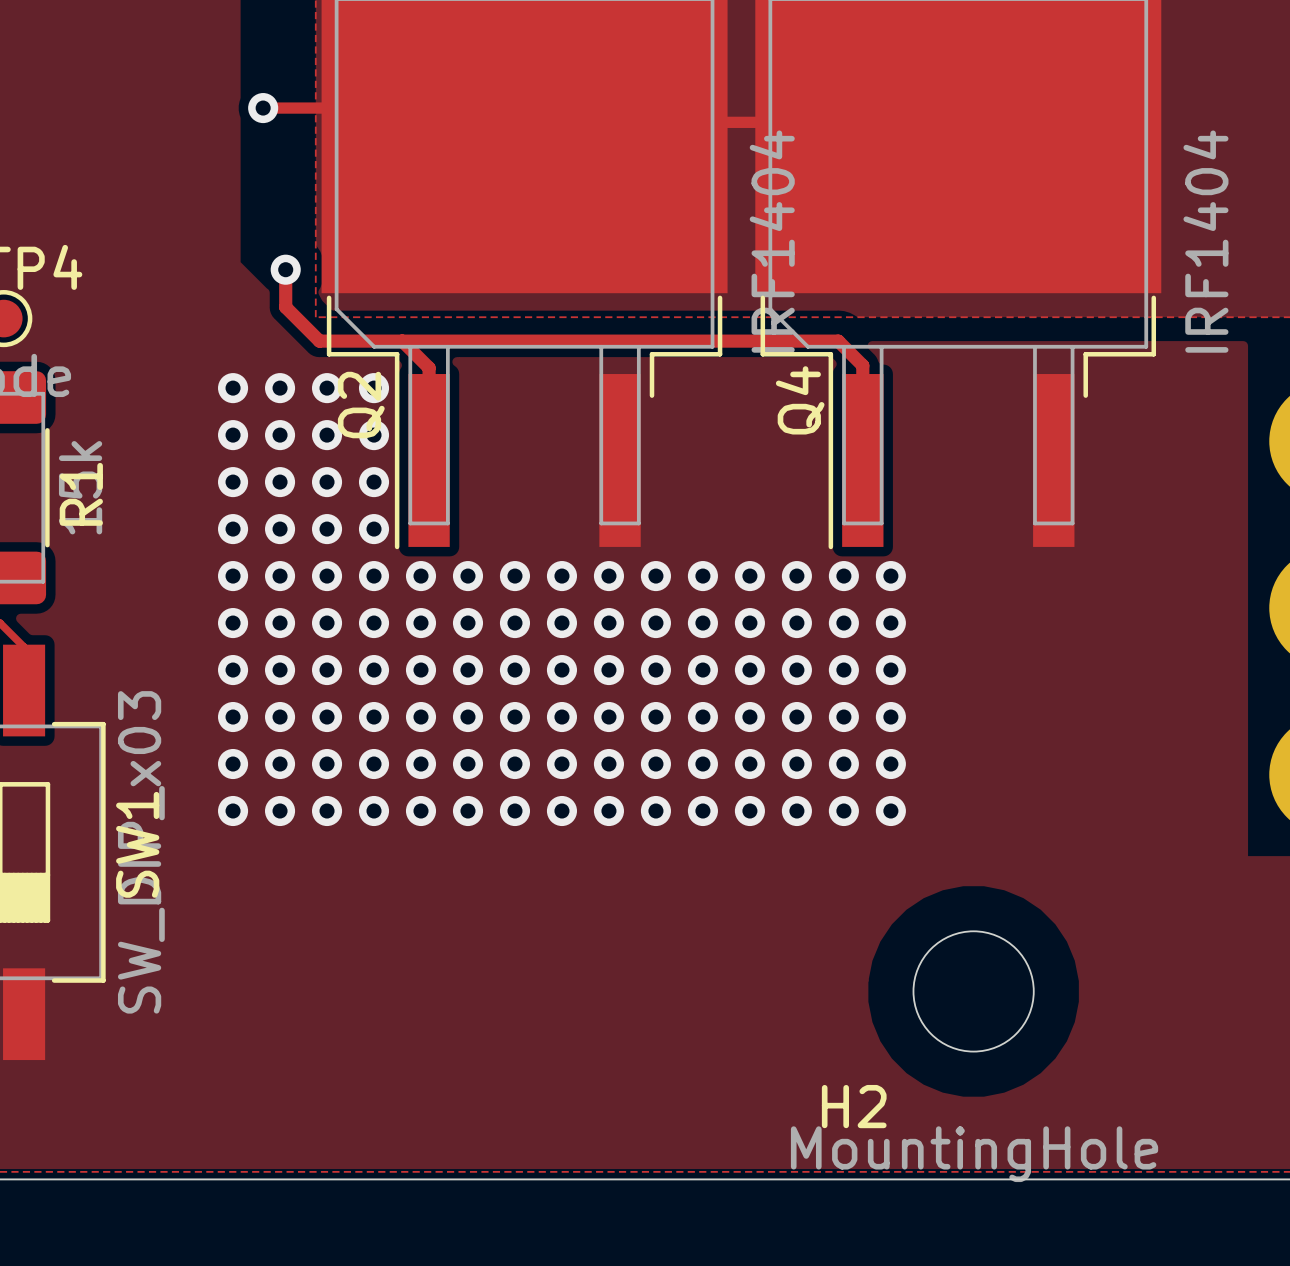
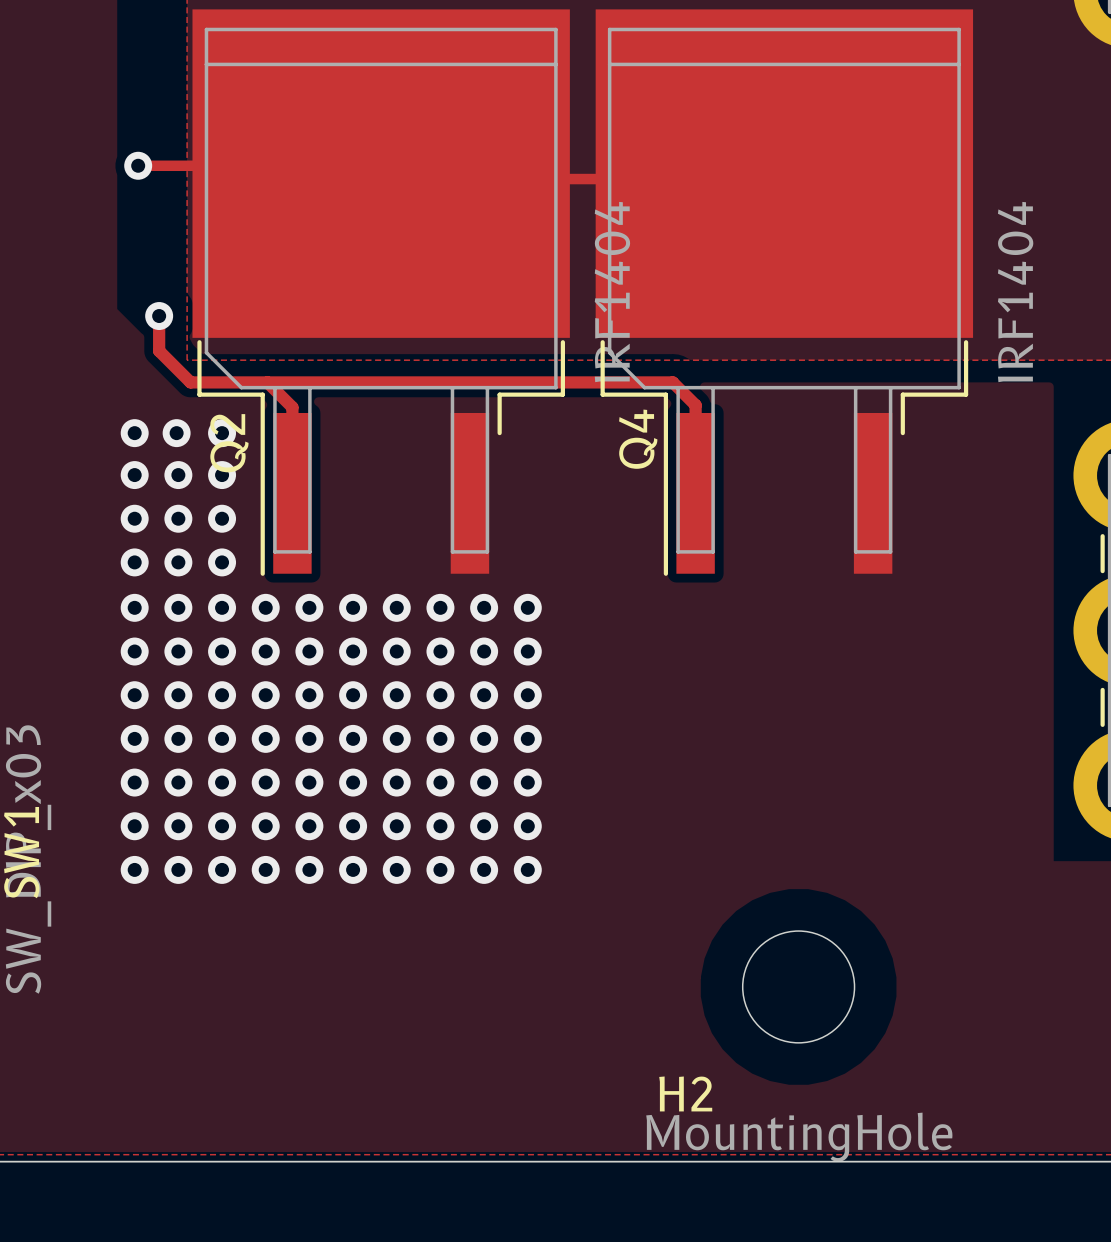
via: (233, 388) -> none
via: (280, 388) -> none
via: (327, 388) -> none
via: (374, 388) -> none
via: none -> (134, 433)
via: none -> (176, 433)
via: none -> (222, 433)
via: (233, 435) -> none
via: (280, 435) -> none
via: (327, 435) -> none
via: (374, 435) -> none
via: none -> (134, 475)
via: none -> (178, 475)
via: none -> (222, 475)
via: (233, 482) -> none
via: (280, 482) -> none
via: (327, 482) -> none
via: (374, 482) -> none
via: none -> (134, 518)
via: none -> (178, 518)
via: none -> (222, 518)
via: (233, 529) -> none
via: (280, 529) -> none
via: (327, 529) -> none
via: (374, 529) -> none
via: none -> (134, 562)
via: none -> (178, 562)
via: none -> (222, 562)
via: (233, 576) -> none
via: (280, 576) -> none
via: (327, 576) -> none
via: (374, 576) -> none
via: (421, 576) -> none
via: (467, 576) -> none
via: (514, 576) -> none
via: (561, 576) -> none
via: (608, 576) -> none
via: (655, 576) -> none
via: (702, 576) -> none
via: (749, 576) -> none
via: (796, 576) -> none
via: (843, 576) -> none
via: (890, 576) -> none
via: none -> (134, 607)
via: none -> (178, 607)
via: none -> (222, 607)
via: none -> (265, 607)
via: none -> (309, 607)
via: none -> (353, 607)
via: none -> (396, 607)
via: none -> (440, 607)
via: none -> (484, 607)
via: none -> (527, 607)
via: (233, 623) -> none
via: (280, 623) -> none
via: (327, 623) -> none
via: (374, 623) -> none
via: (421, 623) -> none
via: (467, 623) -> none
via: (514, 623) -> none
via: (561, 623) -> none
via: (608, 623) -> none
via: (655, 623) -> none
via: (702, 623) -> none
via: (749, 623) -> none
via: (796, 623) -> none
via: (843, 623) -> none
via: (890, 623) -> none
via: none -> (134, 651)
via: none -> (178, 651)
via: none -> (222, 651)
via: none -> (265, 651)
via: none -> (309, 651)
via: none -> (353, 651)
via: none -> (396, 651)
via: none -> (440, 651)
via: none -> (484, 651)
via: none -> (527, 651)
via: (233, 670) -> none
via: (280, 670) -> none
via: (327, 670) -> none
via: (374, 670) -> none
via: (421, 670) -> none
via: (467, 670) -> none
via: (514, 670) -> none
via: (561, 670) -> none
via: (608, 670) -> none
via: (655, 670) -> none
via: (702, 670) -> none
via: (749, 670) -> none
via: (796, 670) -> none
via: (843, 670) -> none
via: (890, 670) -> none
via: none -> (134, 695)
via: none -> (178, 695)
via: none -> (222, 695)
via: none -> (265, 695)
via: none -> (309, 695)
via: none -> (353, 695)
via: none -> (396, 695)
via: none -> (440, 695)
via: none -> (484, 695)
via: none -> (527, 695)
via: (233, 717) -> none
via: (280, 717) -> none
via: (327, 717) -> none
via: (374, 717) -> none
via: (421, 717) -> none
via: (467, 717) -> none
via: (514, 717) -> none
via: (561, 717) -> none
via: (608, 717) -> none
via: (655, 717) -> none
via: (702, 717) -> none
via: (749, 717) -> none
via: (796, 717) -> none
via: (843, 717) -> none
via: (890, 717) -> none
via: none -> (134, 738)
via: none -> (178, 738)
via: none -> (222, 738)
via: none -> (265, 738)
via: none -> (309, 738)
via: none -> (353, 738)
via: none -> (396, 738)
via: none -> (440, 738)
via: none -> (484, 738)
via: none -> (527, 738)
via: (233, 764) -> none
via: (280, 764) -> none
via: (327, 764) -> none
via: (374, 764) -> none
via: (421, 764) -> none
via: (467, 764) -> none
via: (514, 764) -> none
via: (561, 764) -> none
via: (608, 764) -> none
via: (655, 764) -> none
via: (702, 764) -> none
via: (749, 764) -> none
via: (796, 764) -> none
via: (843, 764) -> none
via: (890, 764) -> none
via: none -> (134, 782)
via: none -> (178, 782)
via: none -> (222, 782)
via: none -> (265, 782)
via: none -> (309, 782)
via: none -> (353, 782)
via: none -> (396, 782)
via: none -> (440, 782)
via: none -> (484, 782)
via: none -> (527, 782)
via: (233, 811) -> none
via: (280, 811) -> none
via: (327, 811) -> none
via: (374, 811) -> none
via: (421, 811) -> none
via: (467, 811) -> none
via: (514, 811) -> none
via: (561, 811) -> none
via: (608, 811) -> none
via: (655, 811) -> none
via: (702, 811) -> none
via: (749, 811) -> none
via: (796, 811) -> none
via: (843, 811) -> none
via: (890, 811) -> none
via: none -> (134, 826)
via: none -> (178, 826)
via: none -> (222, 826)
via: none -> (265, 826)
via: none -> (309, 826)
via: none -> (353, 826)
via: none -> (396, 826)
via: none -> (440, 826)
via: none -> (484, 826)
via: none -> (527, 826)
via: none -> (134, 869)
via: none -> (178, 869)
via: none -> (222, 869)
via: none -> (265, 869)
via: none -> (309, 869)
via: none -> (353, 869)
via: none -> (396, 869)
via: none -> (440, 869)
via: none -> (484, 869)
via: none -> (527, 869)

